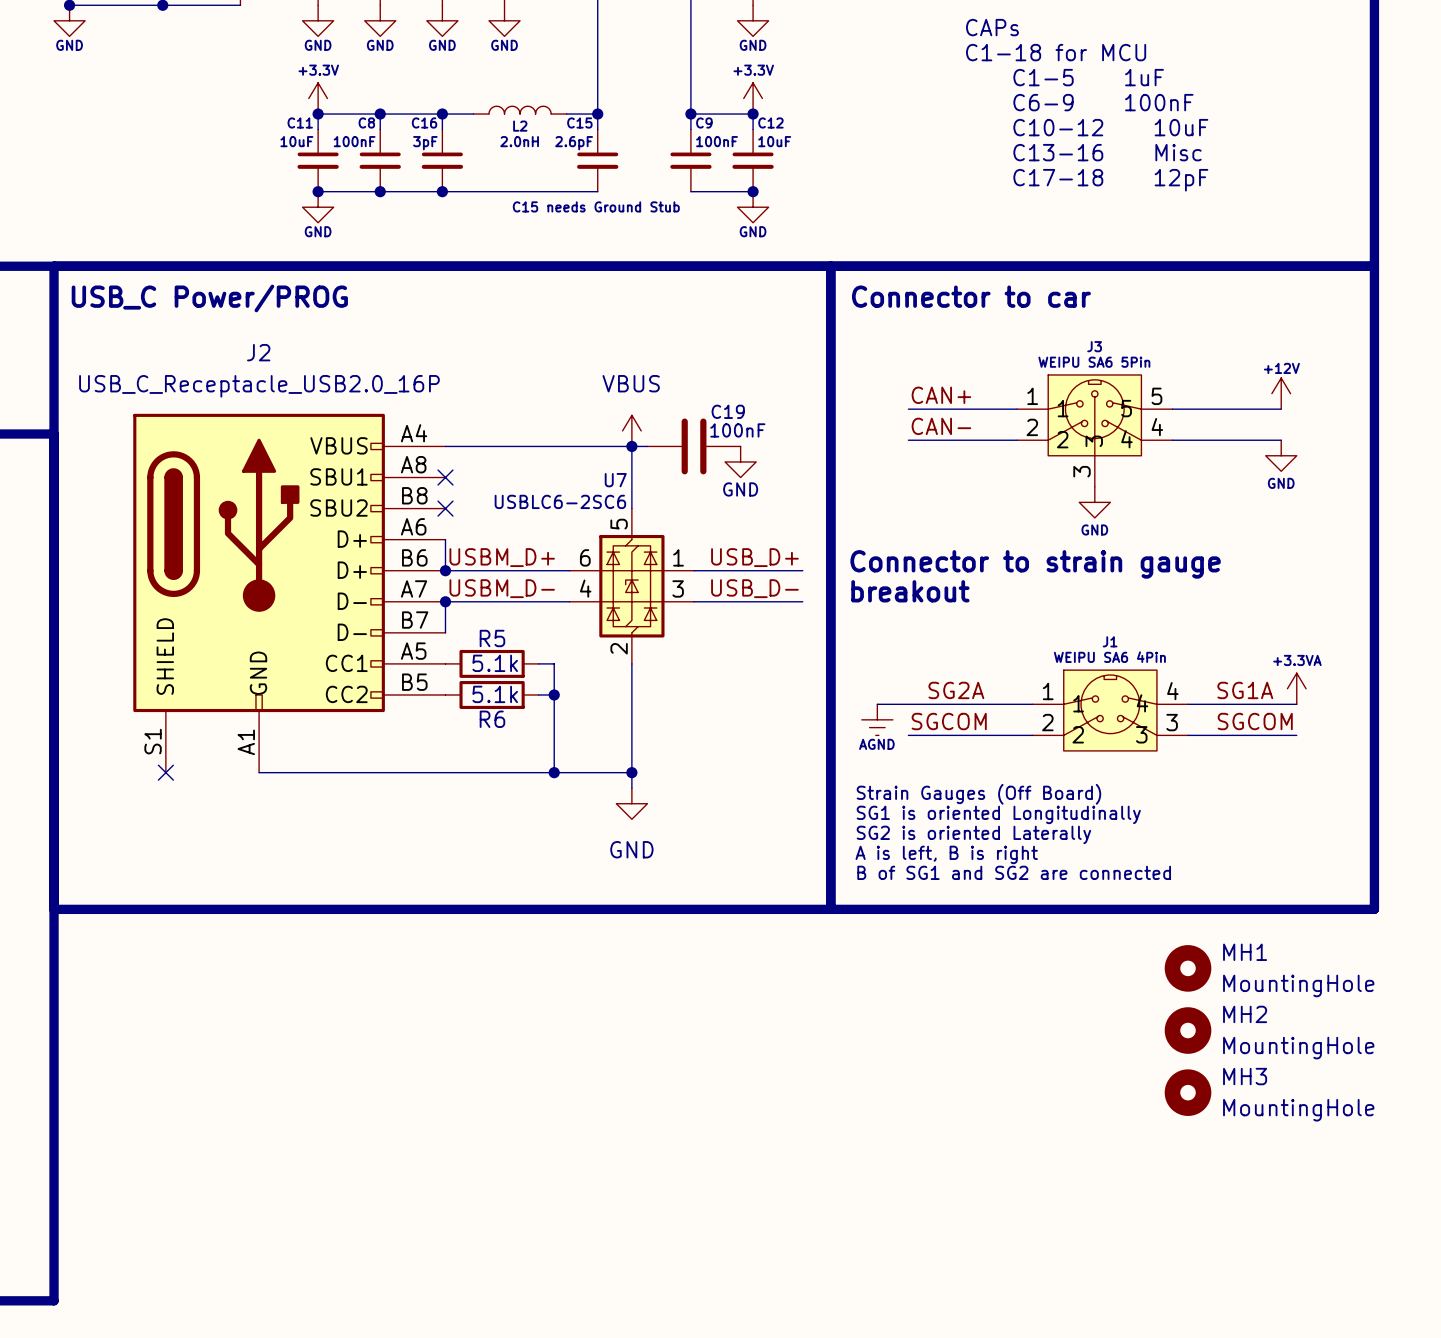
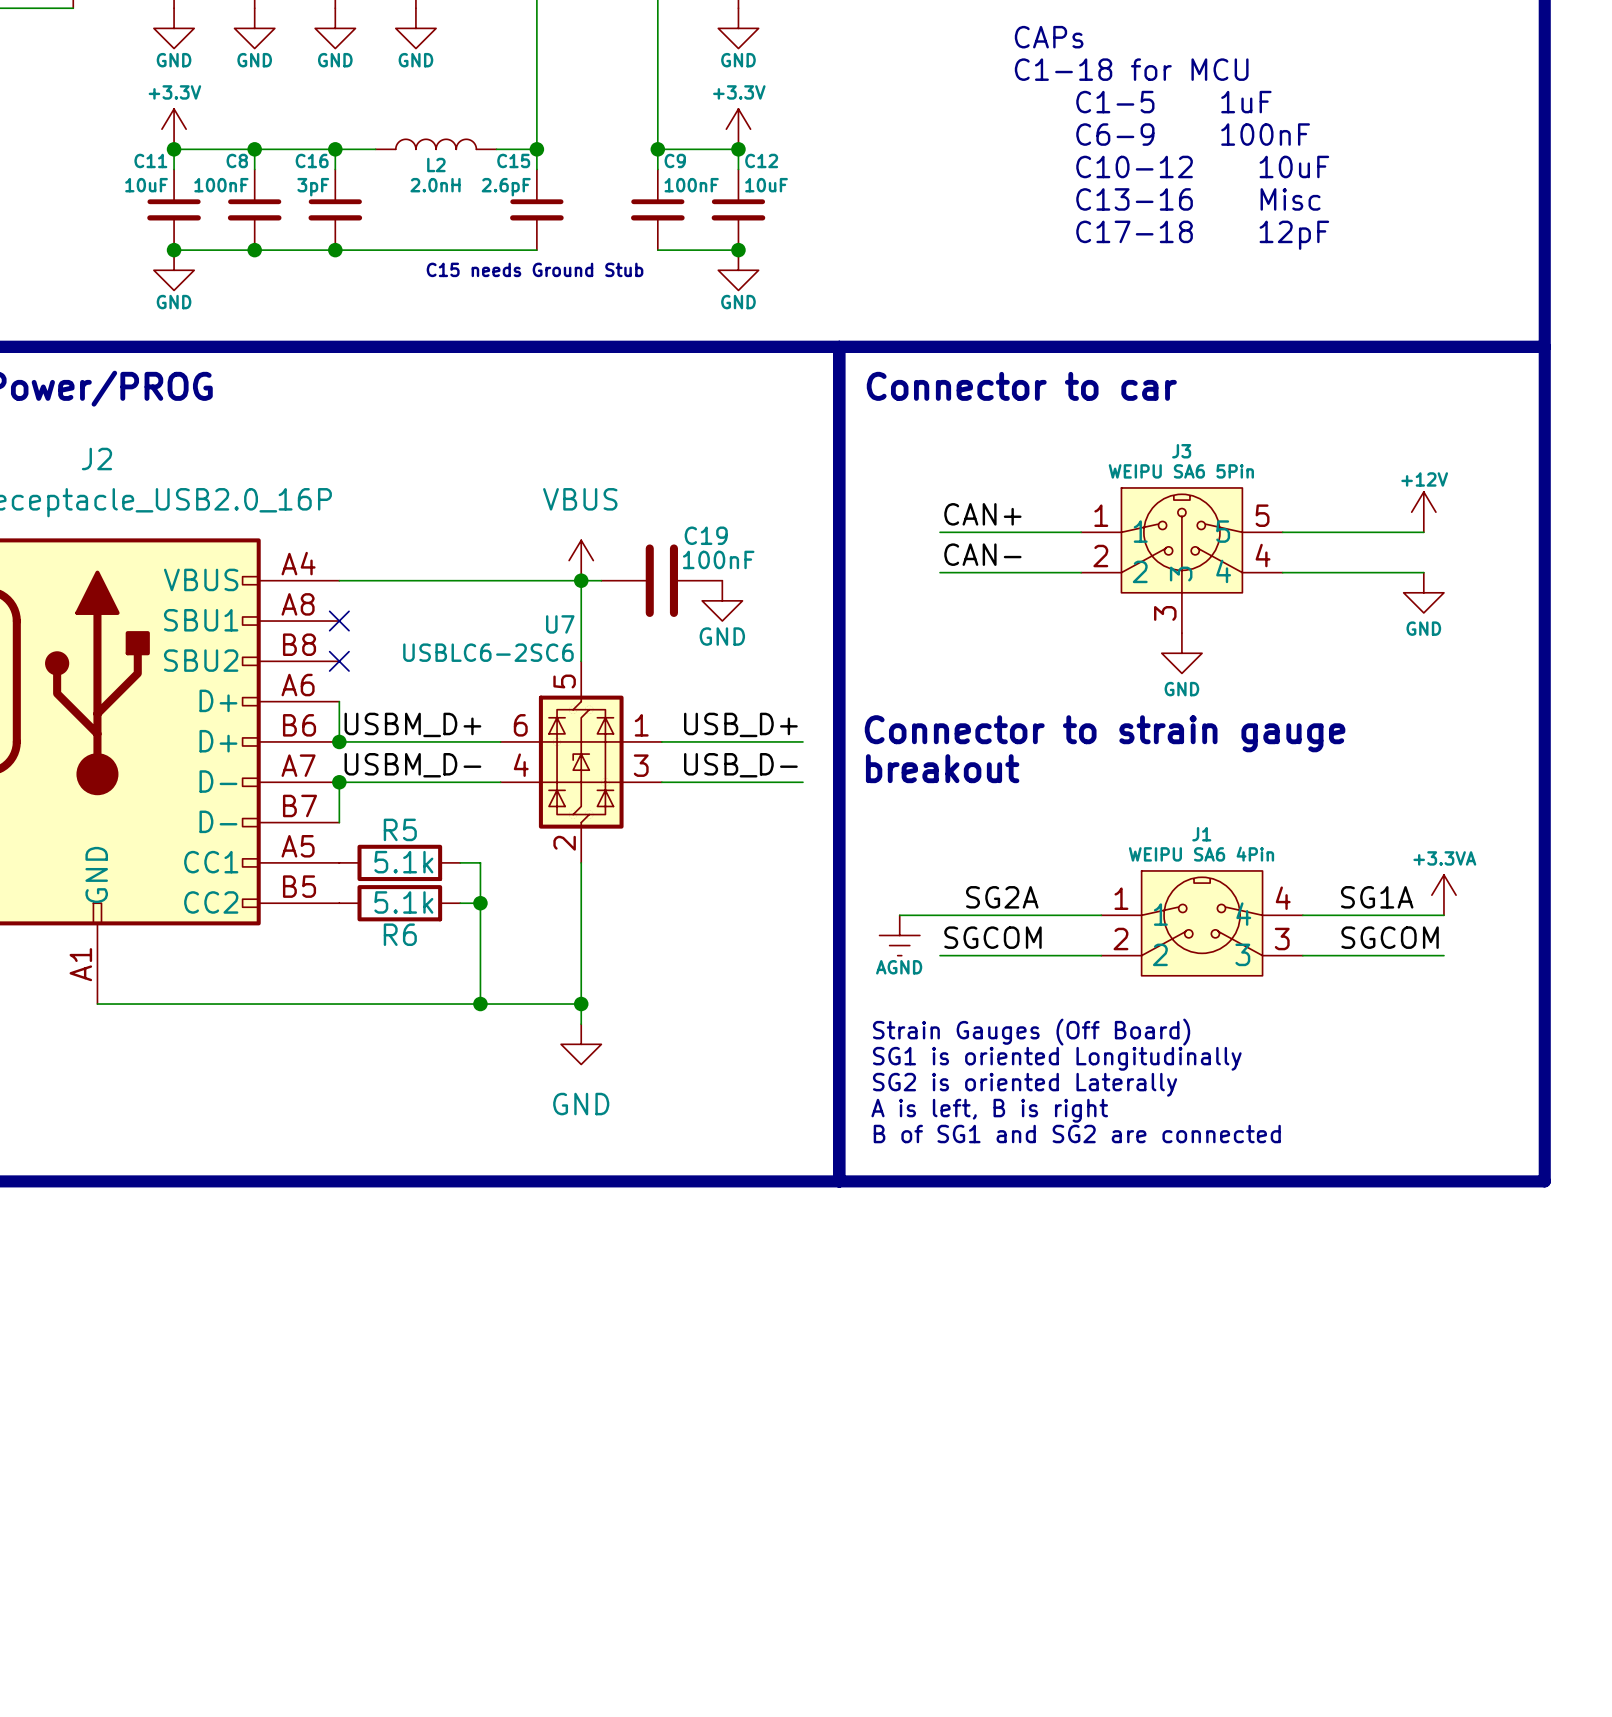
MH1: MountingHole (1188, 968) -> none
MH2: MountingHole (1188, 1030) -> none
MH3: MountingHole (1188, 1092) -> none

